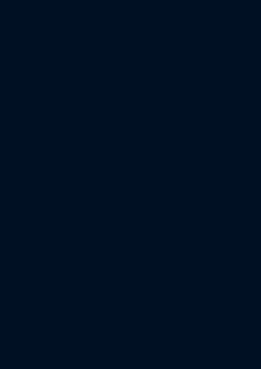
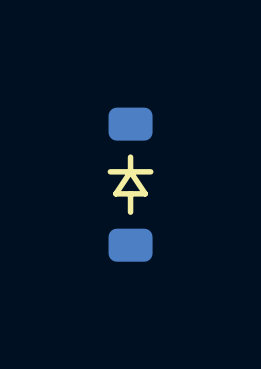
part: none -> (130, 184)

